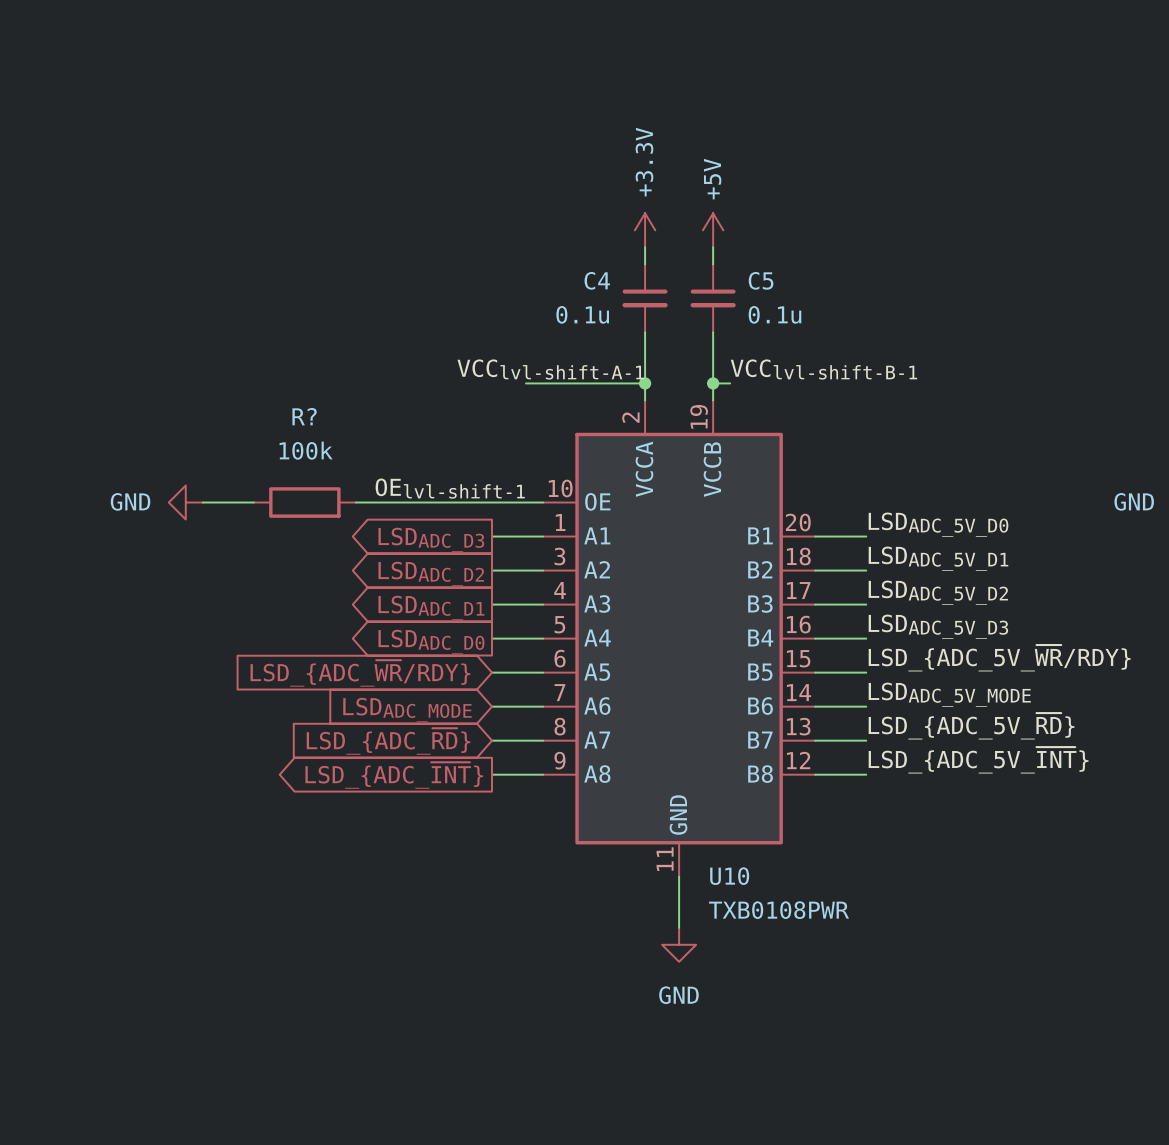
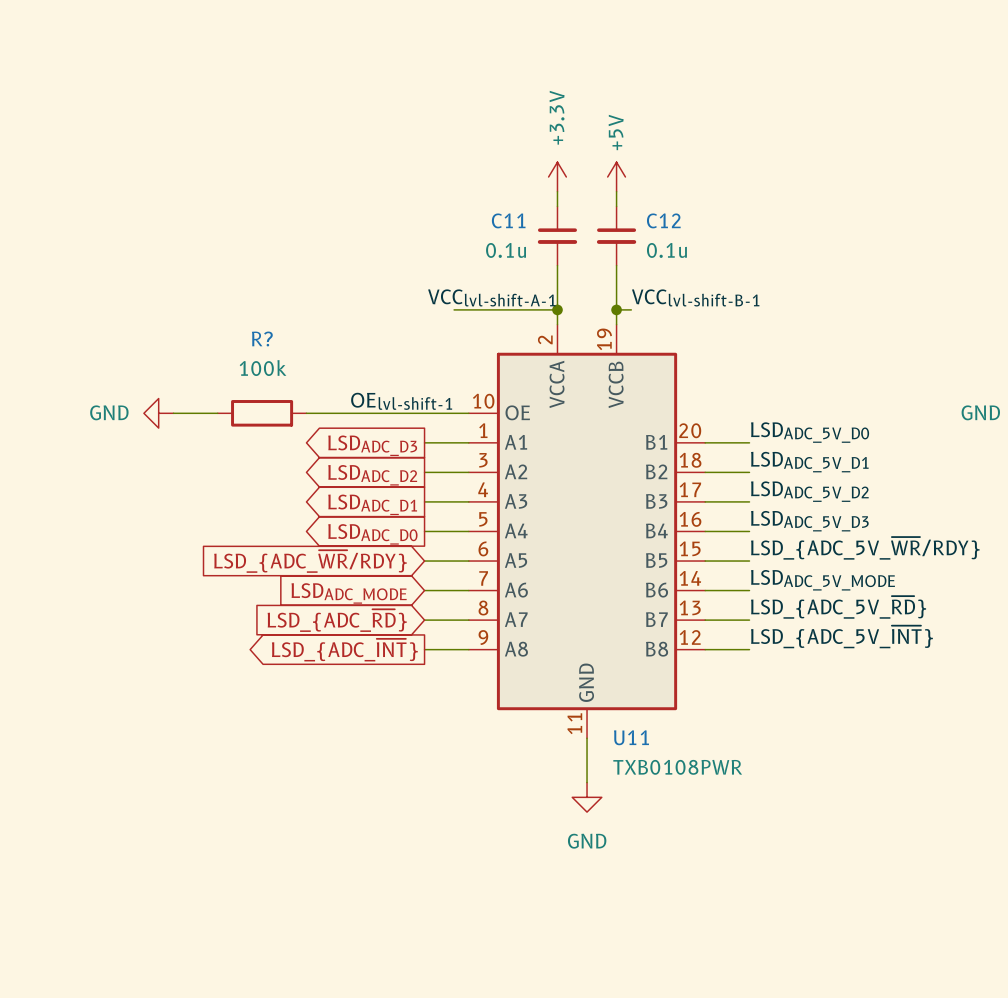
C4 name: C4 (597, 280) -> C11 (508, 220)
C5 name: C5 (761, 280) -> C12 (663, 220)
U10 name: U10 (729, 876) -> U11 (631, 737)

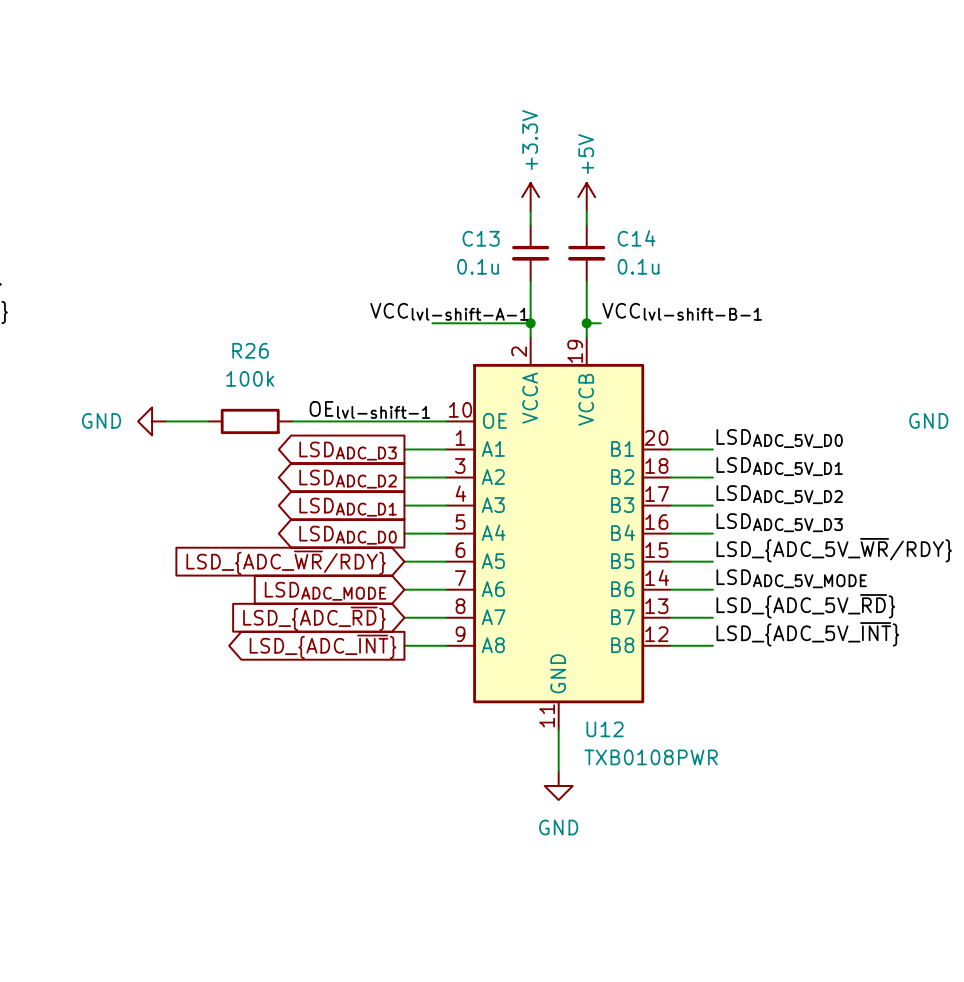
C11 name: C11 (508, 220) -> C13 (481, 238)
C12 name: C12 (663, 220) -> C14 (636, 238)
R? name: R? (262, 338) -> R26 (250, 350)
U11 name: U11 (631, 737) -> U12 (605, 729)

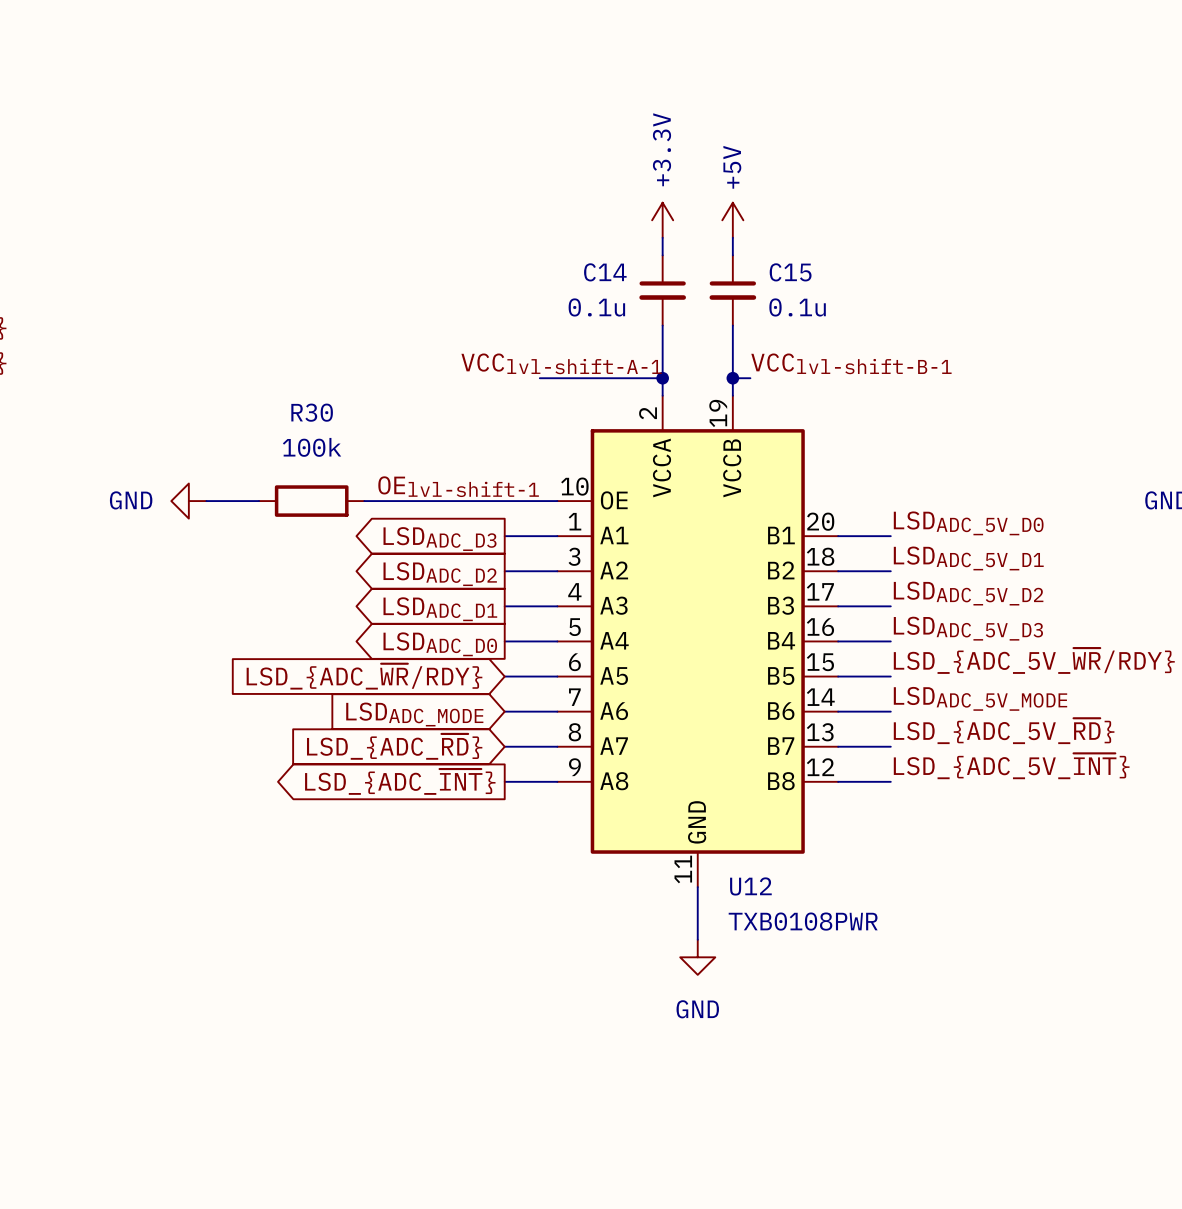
C13 name: C13 (481, 238) -> C14 (605, 272)
C14 name: C14 (636, 238) -> C15 (790, 272)
R26 name: R26 (250, 350) -> R30 (312, 412)

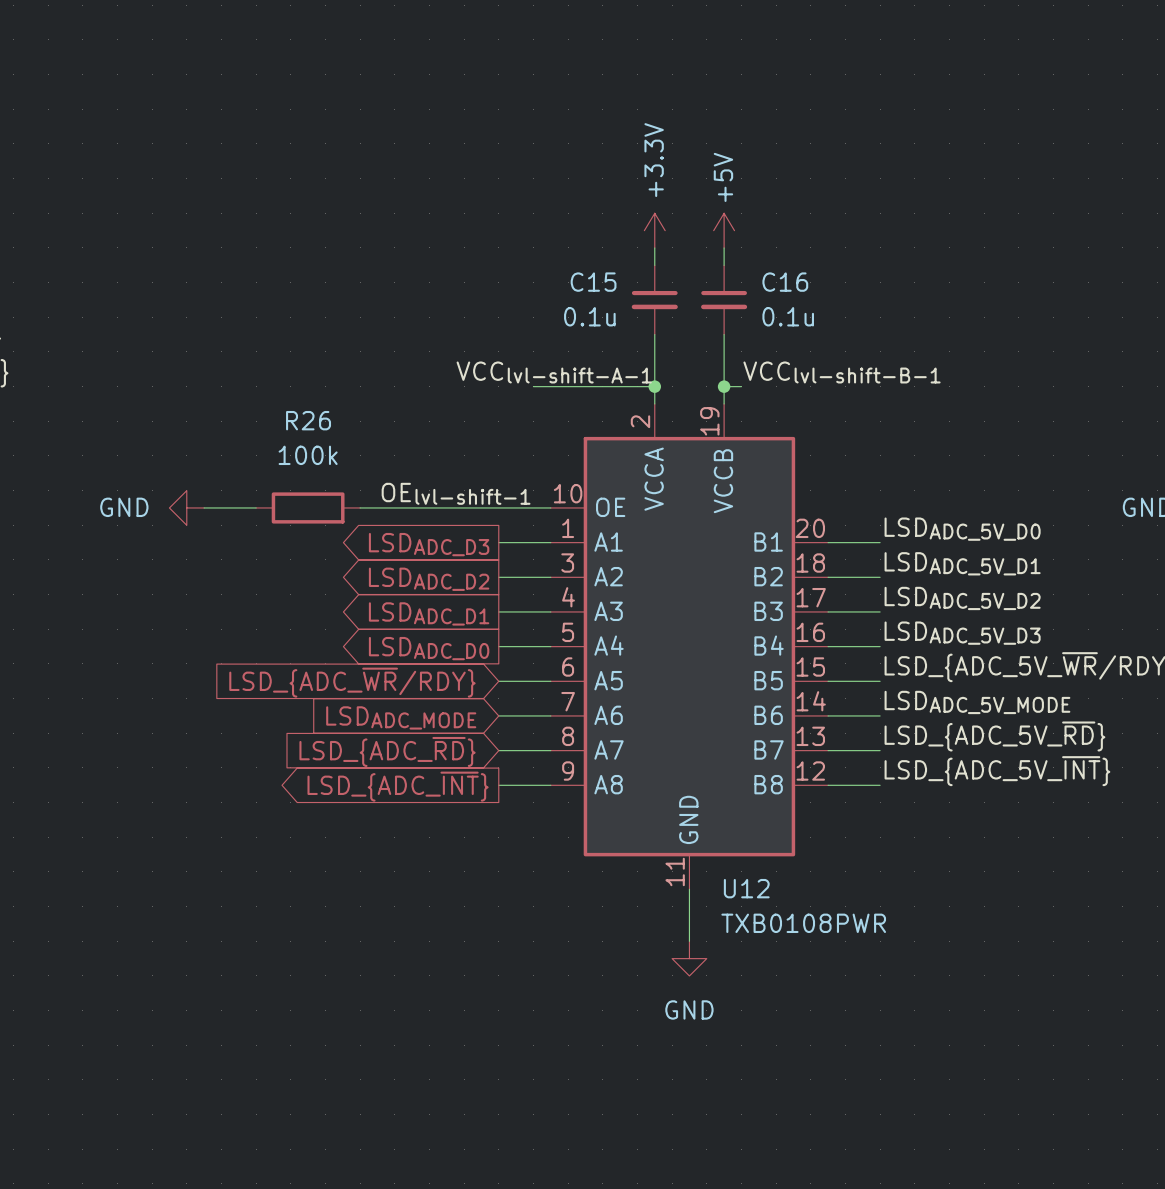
C14 name: C14 (605, 272) -> C15 (593, 282)
C15 name: C15 (790, 272) -> C16 (785, 282)
R30 name: R30 (312, 412) -> R26 (308, 420)

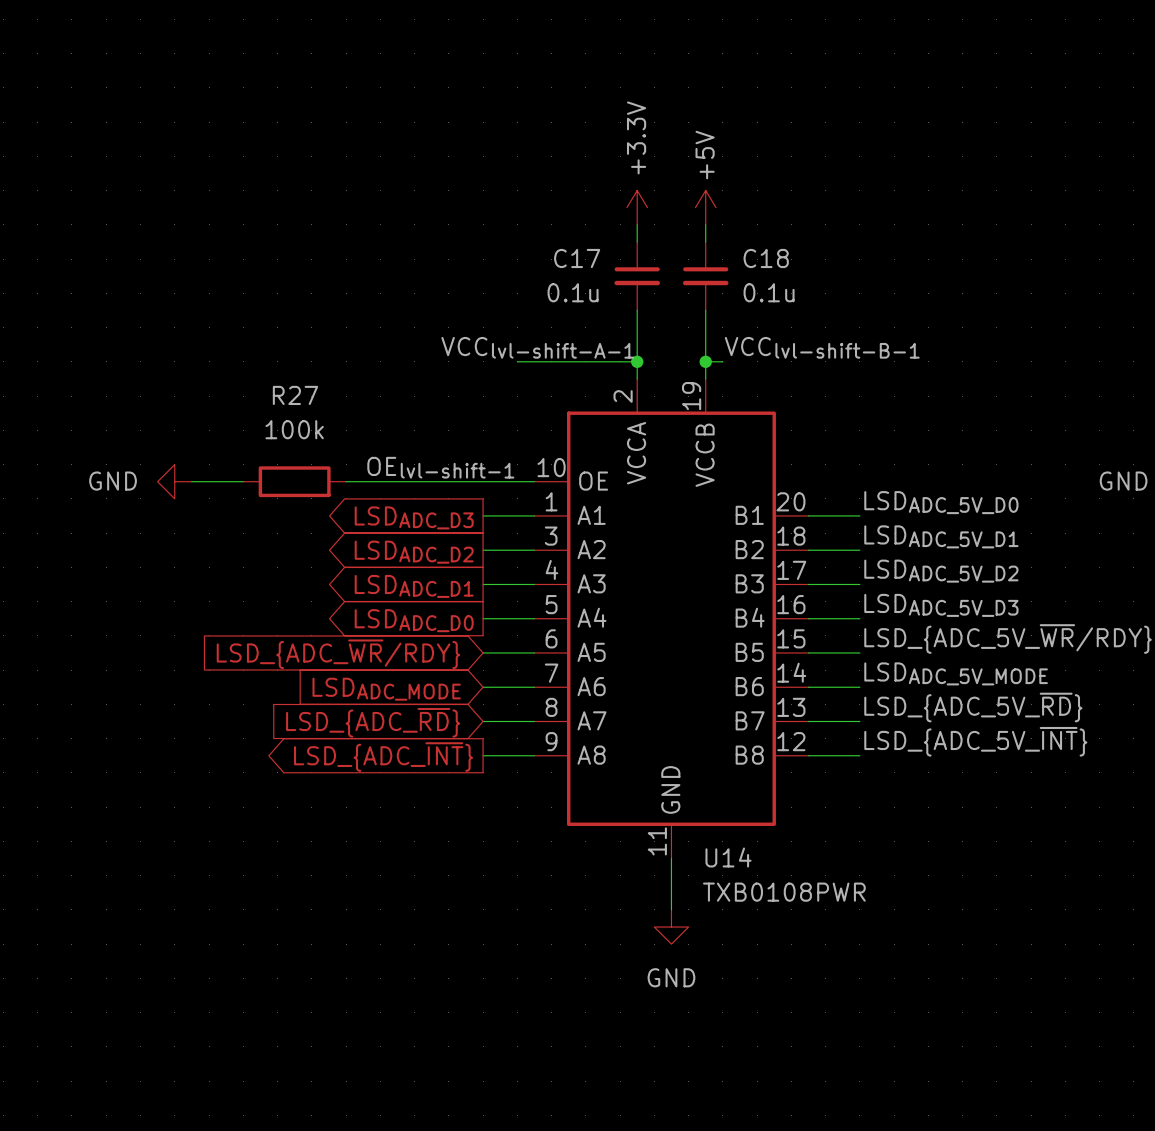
C15 name: C15 (593, 282) -> C17 (577, 258)
C16 name: C16 (785, 282) -> C18 (766, 258)
R26 name: R26 (308, 420) -> R27 (295, 395)
U12 name: U12 (746, 888) -> U14 (728, 857)

